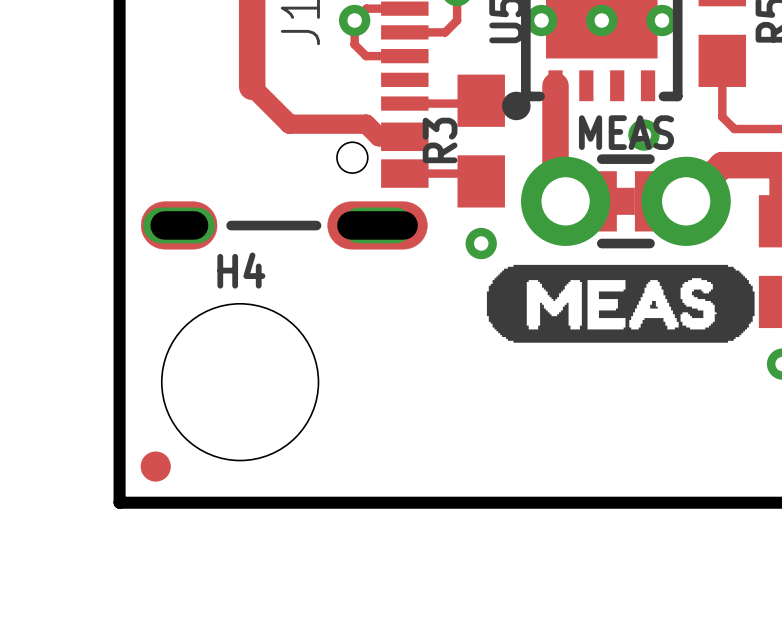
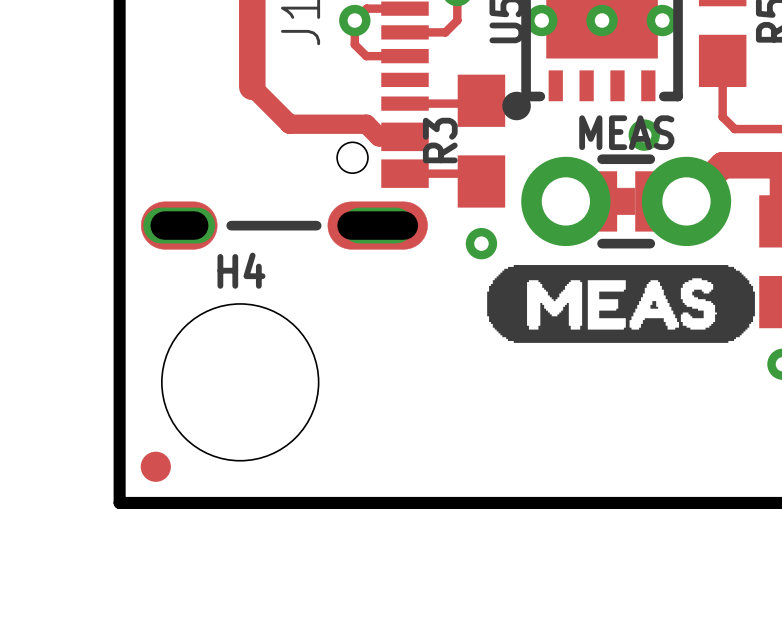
track: (555, 85) (555, 191) (565, 201) -> none

